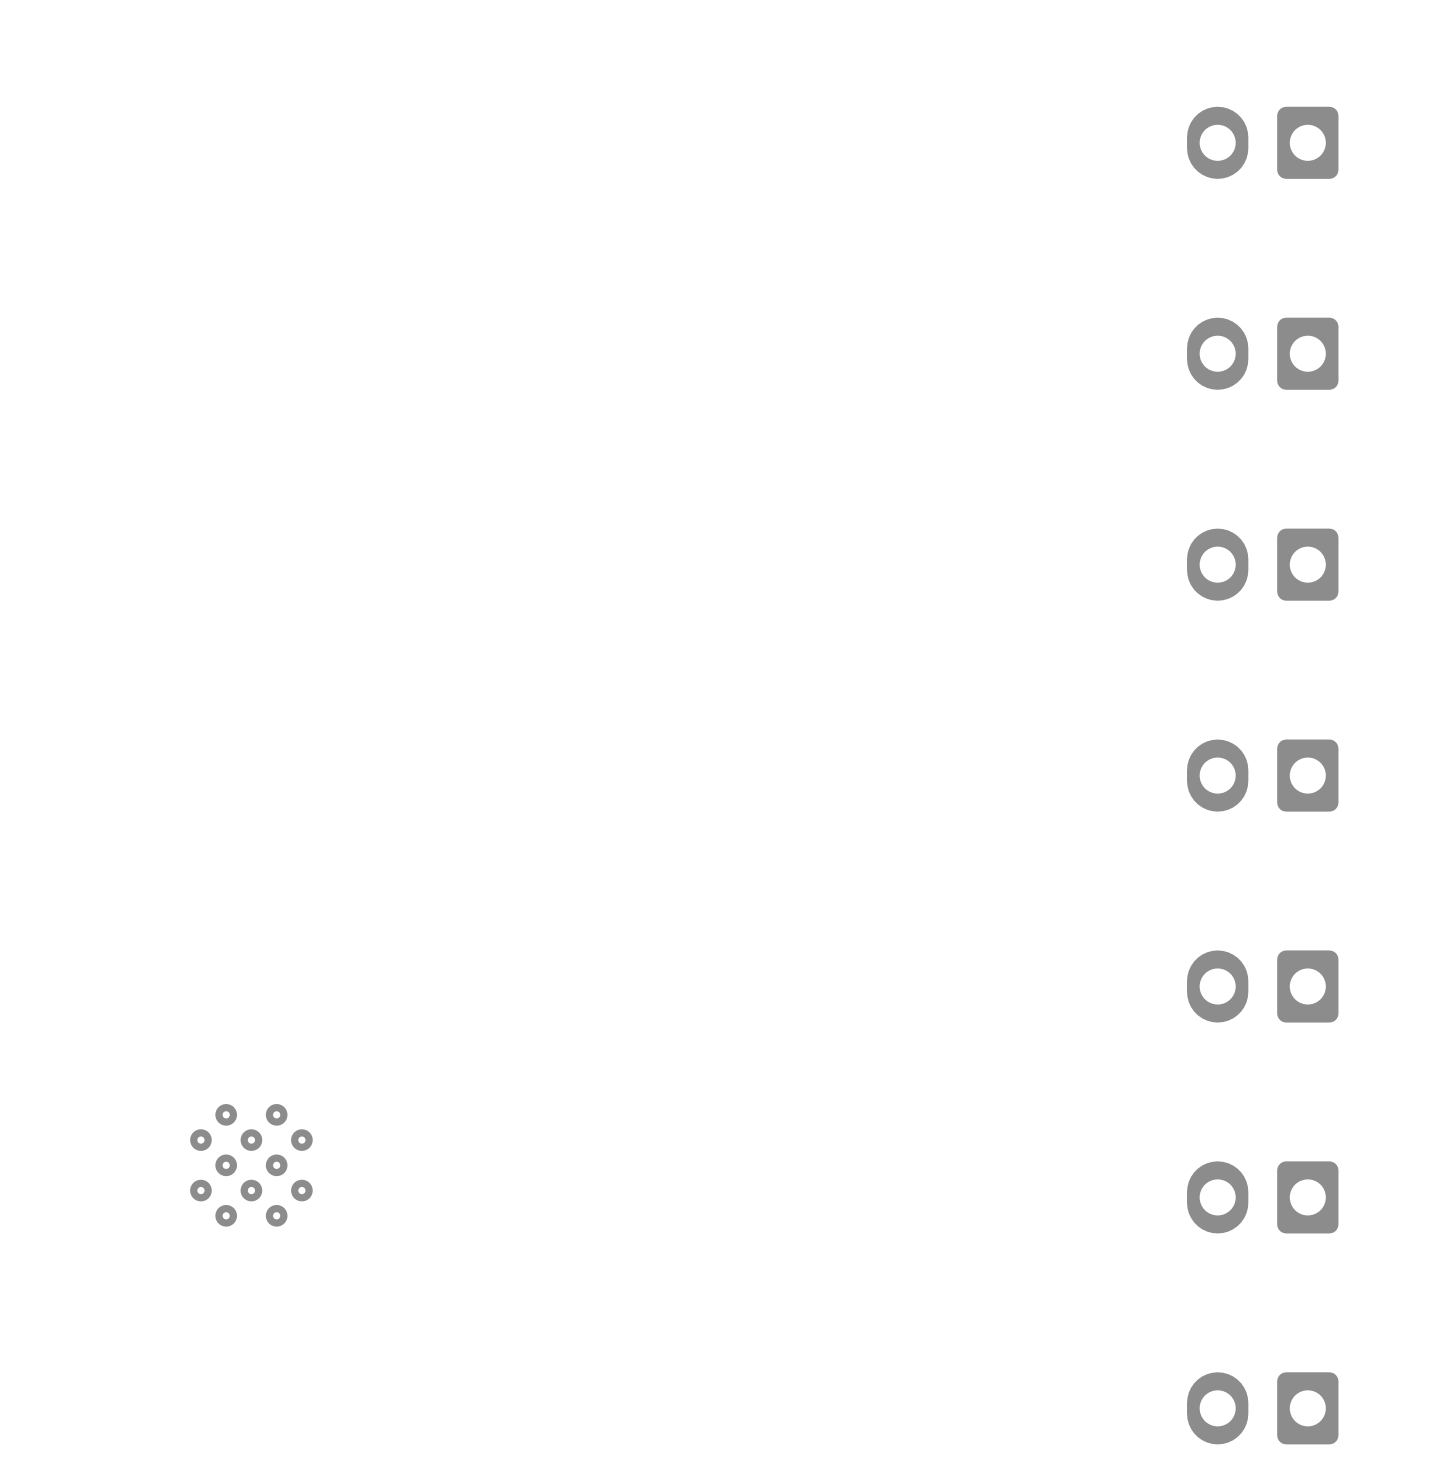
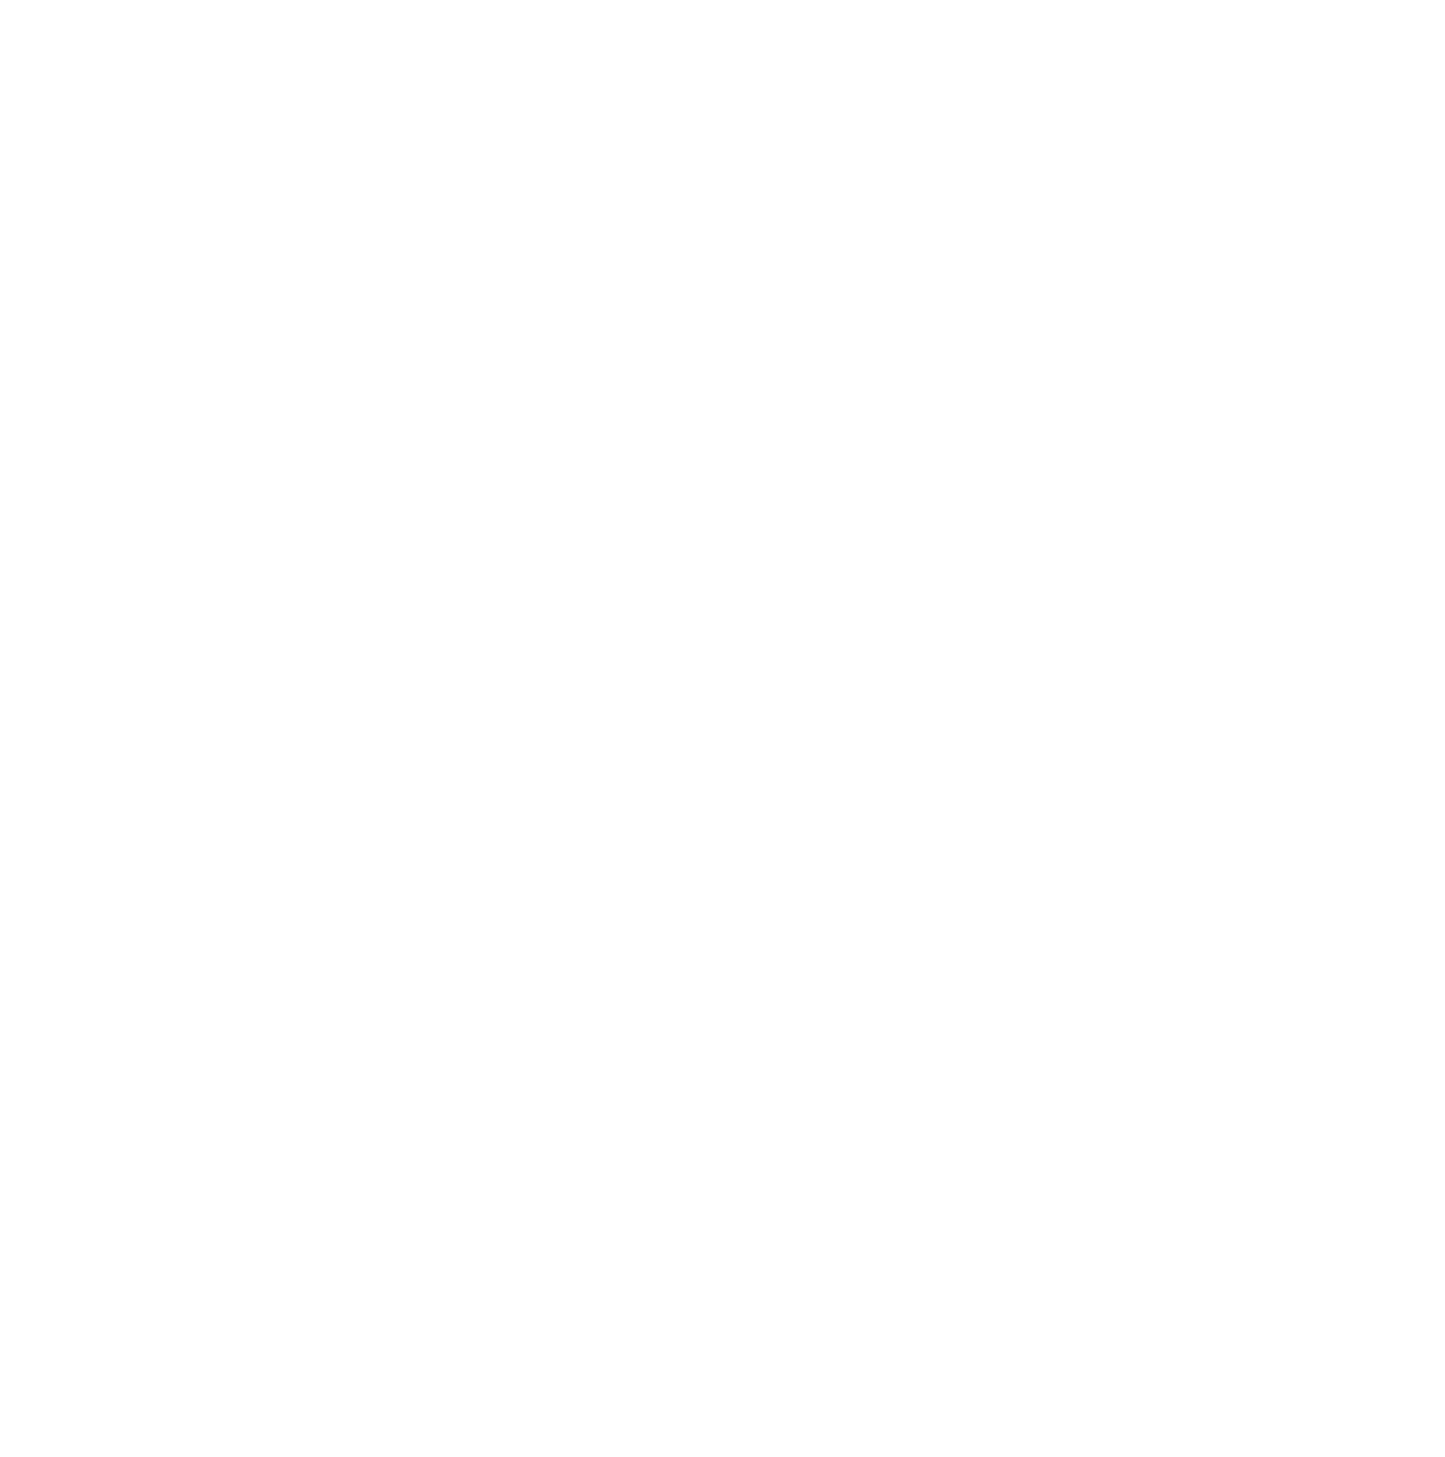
part: (1262, 142) -> none
part: (1262, 353) -> none
part: (1262, 564) -> none
part: (1262, 775) -> none
part: (1262, 986) -> none
part: (251, 1165) -> none
part: (1262, 1197) -> none
part: (1262, 1408) -> none

